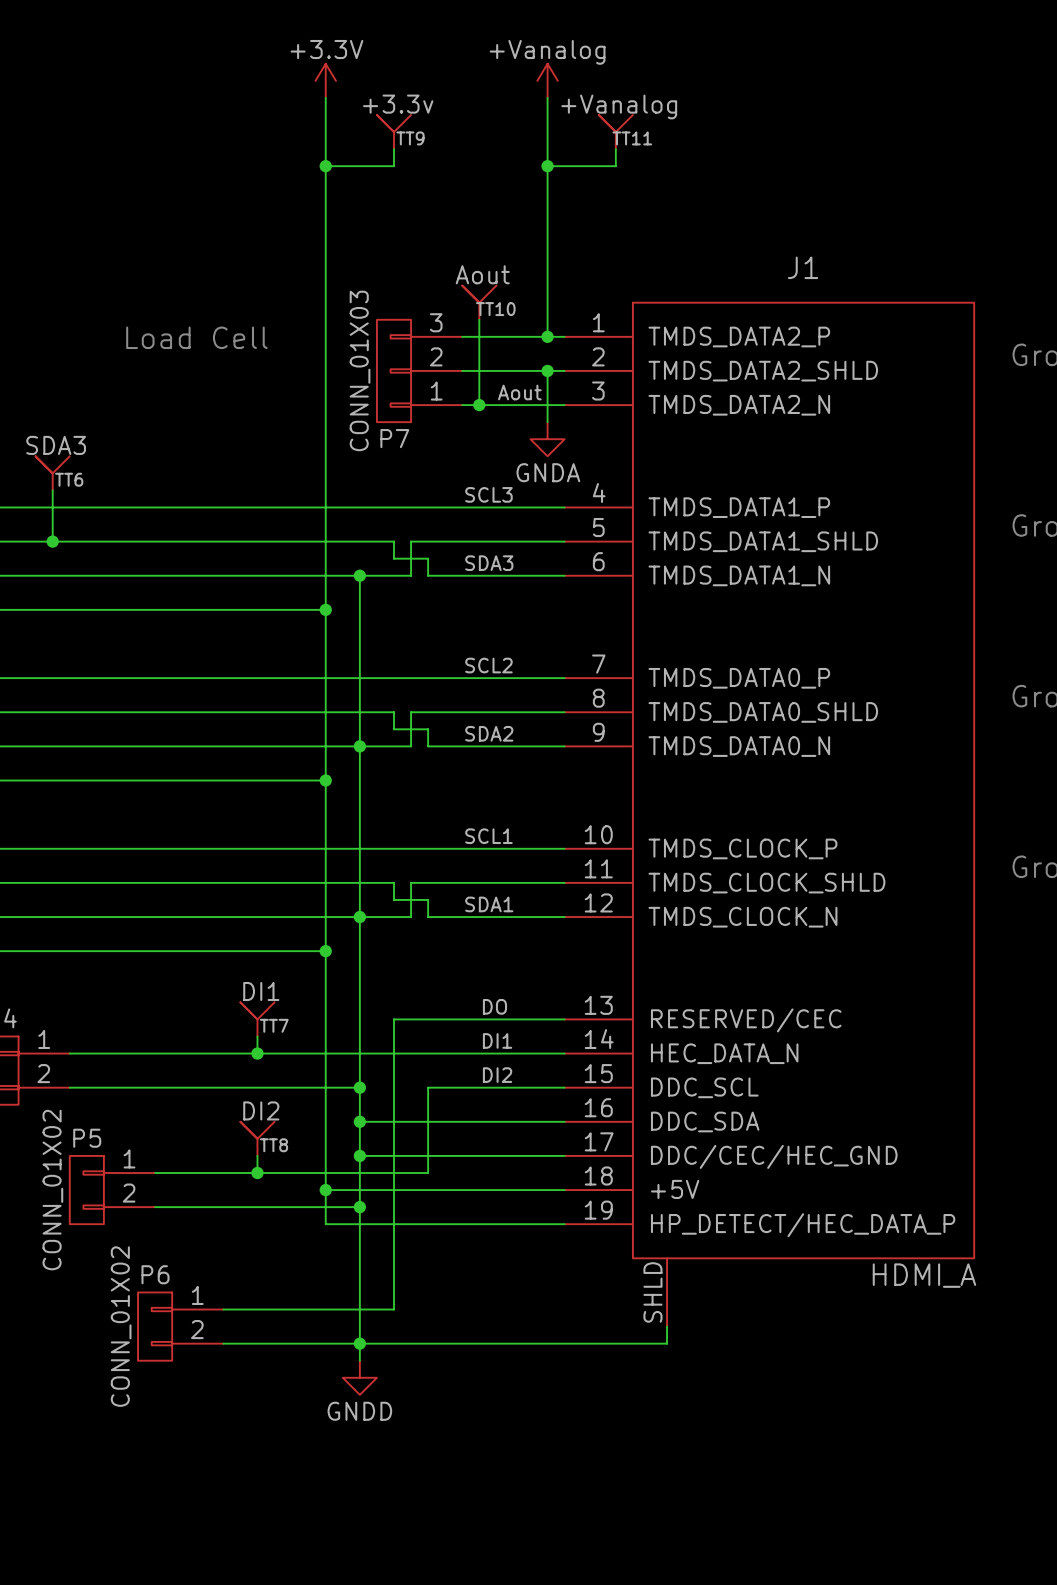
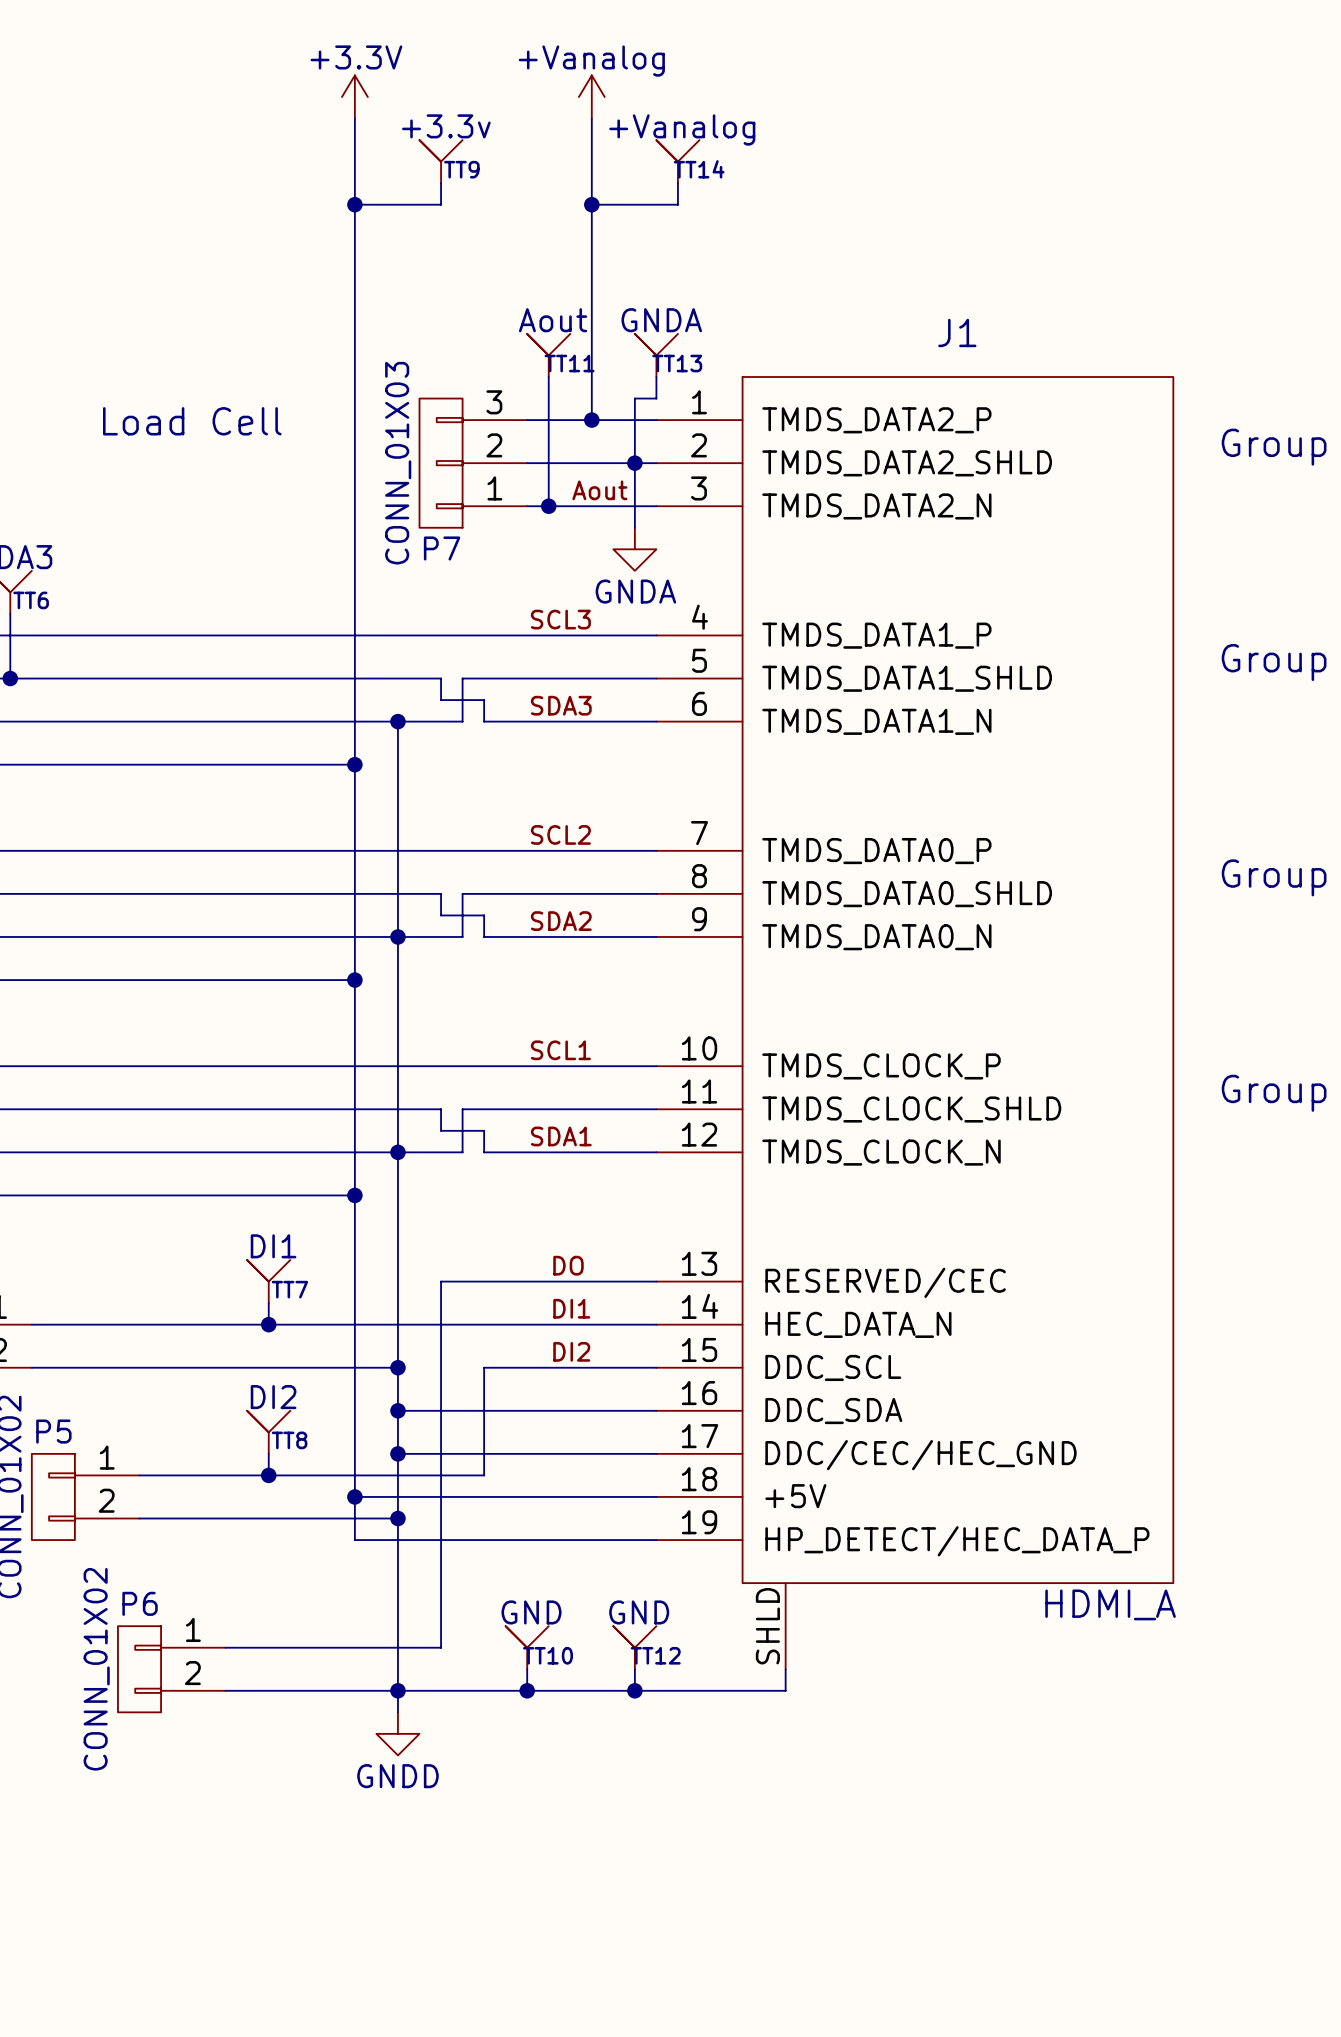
power symbol position: +Vanalog (547, 80) -> +Vanalog (591, 97)
wire: none -> (591, 118) (591, 420)
wire: (547, 97) (547, 319) -> (656, 377) (656, 398) (634, 398)
TT11 value: +Vanalog (619, 106) -> Aout (553, 320)
TT14: none -> +Vanalog (677, 161)
TT11 position: (615, 132) -> (548, 355)
wire: (615, 149) (615, 166) (581, 166) -> (677, 183) (677, 204)
wire: none -> (591, 204) (634, 204)
junction position: (547, 166) -> (591, 204)
TT10 value: Aout (482, 274) -> GND (531, 1612)
TT13: none -> GNDA (656, 355)
TT10 position: (479, 302) -> (527, 1647)
wire: none -> (634, 420) (634, 463)
junction position: (547, 336) -> (591, 420)
TT12: none -> GND (634, 1647)
wire: none -> (527, 1669) (527, 1690)
wire: none -> (634, 1669) (634, 1690)
junction: none -> (527, 1690)
junction: none -> (634, 1690)

